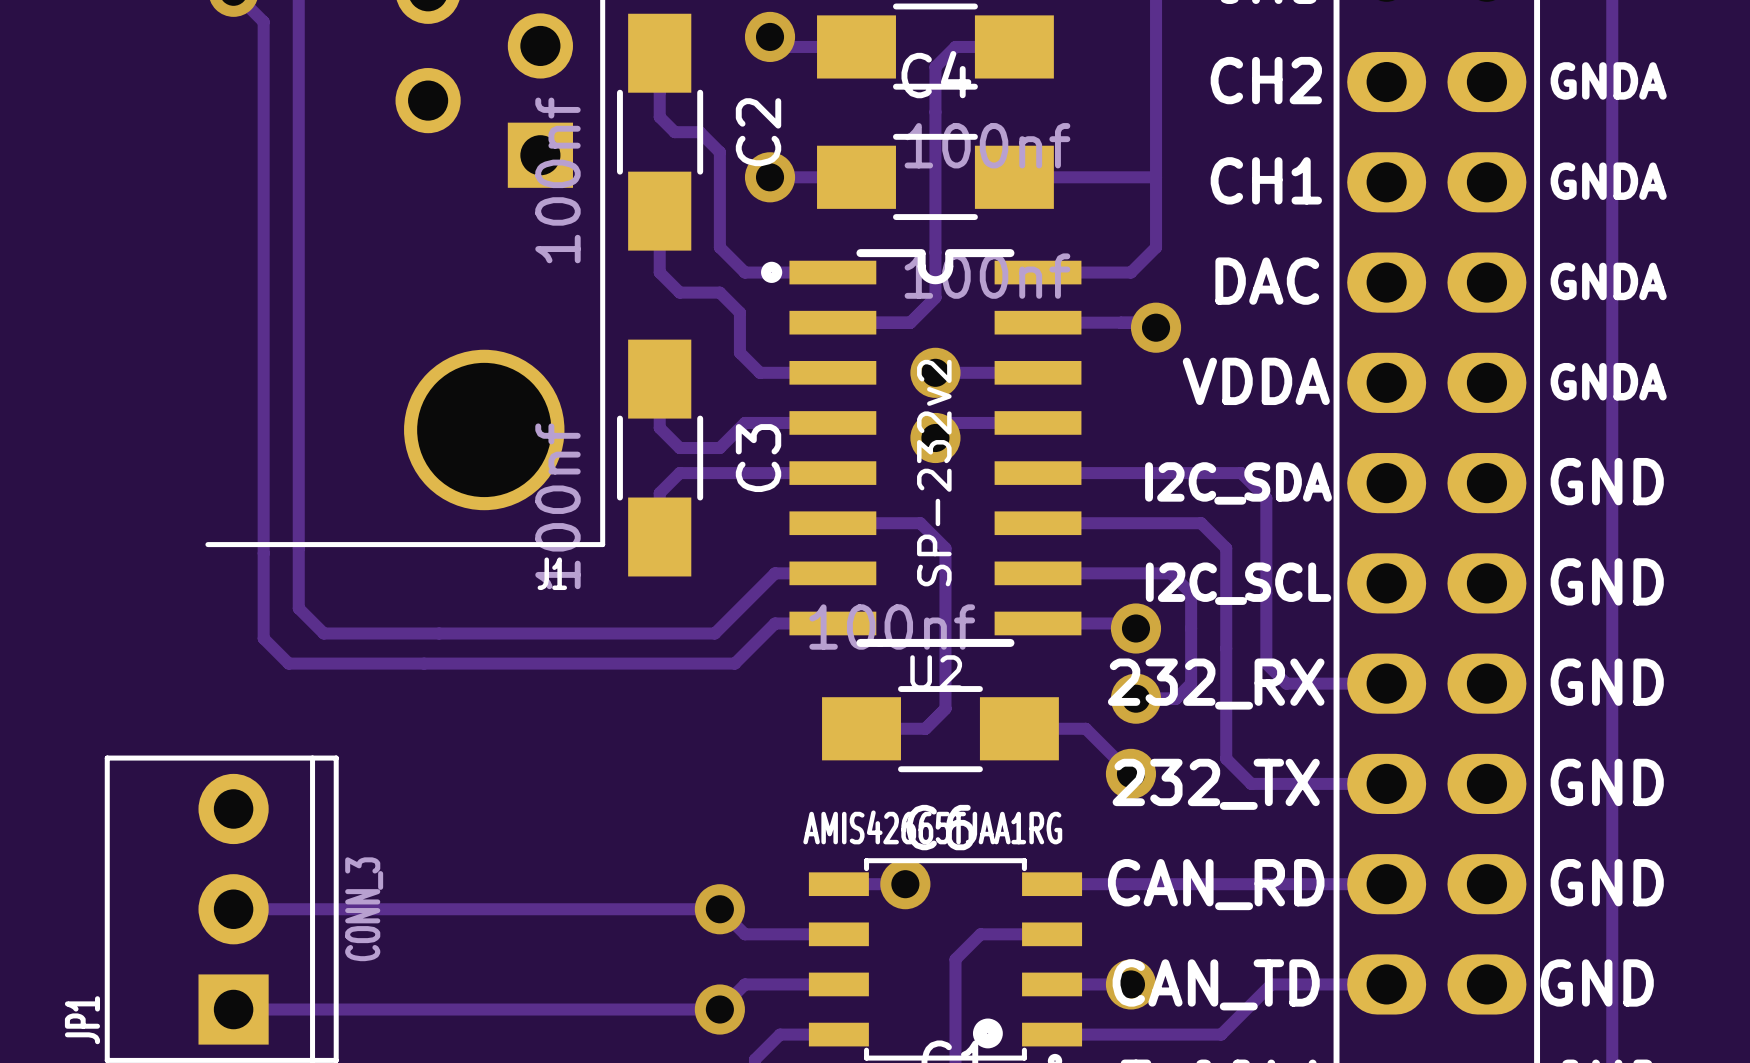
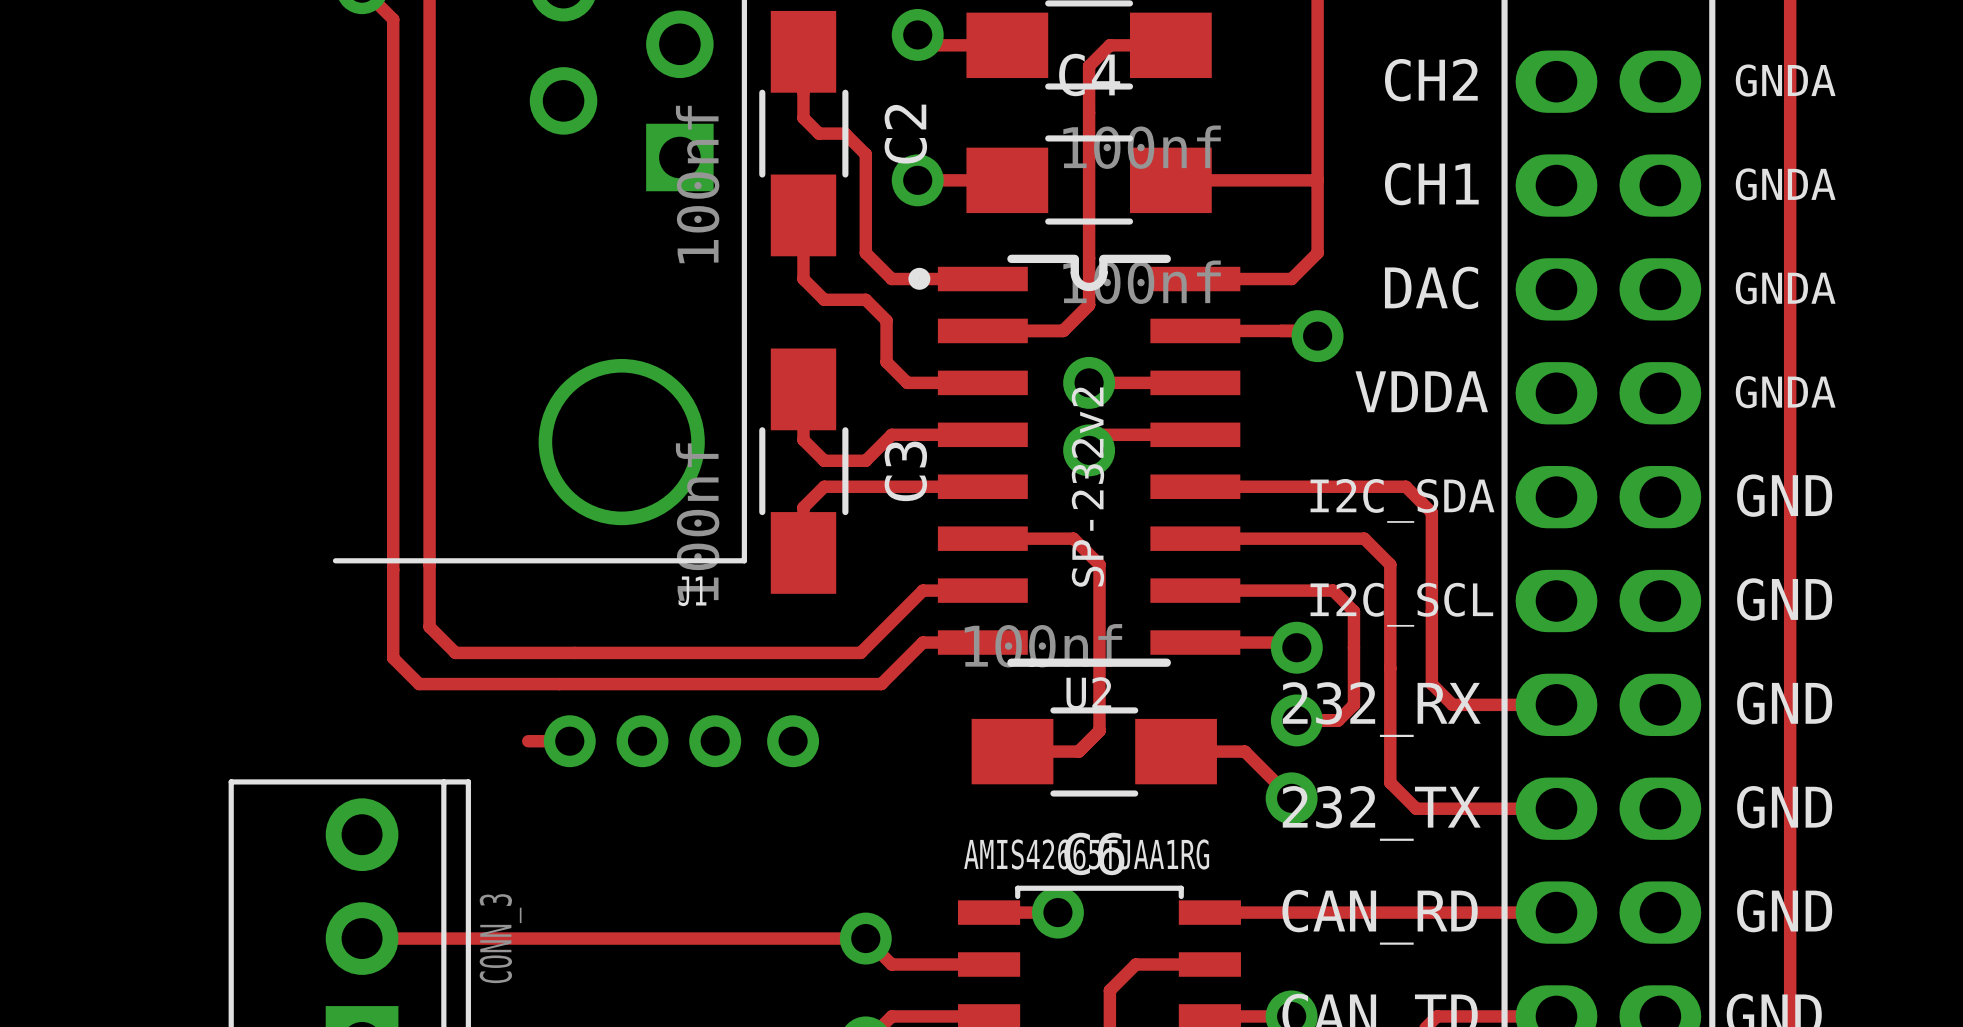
track: none -> (528, 741) (569, 741)
via: none -> (569, 741)
via: none -> (642, 741)
via: none -> (715, 741)
via: none -> (793, 741)

